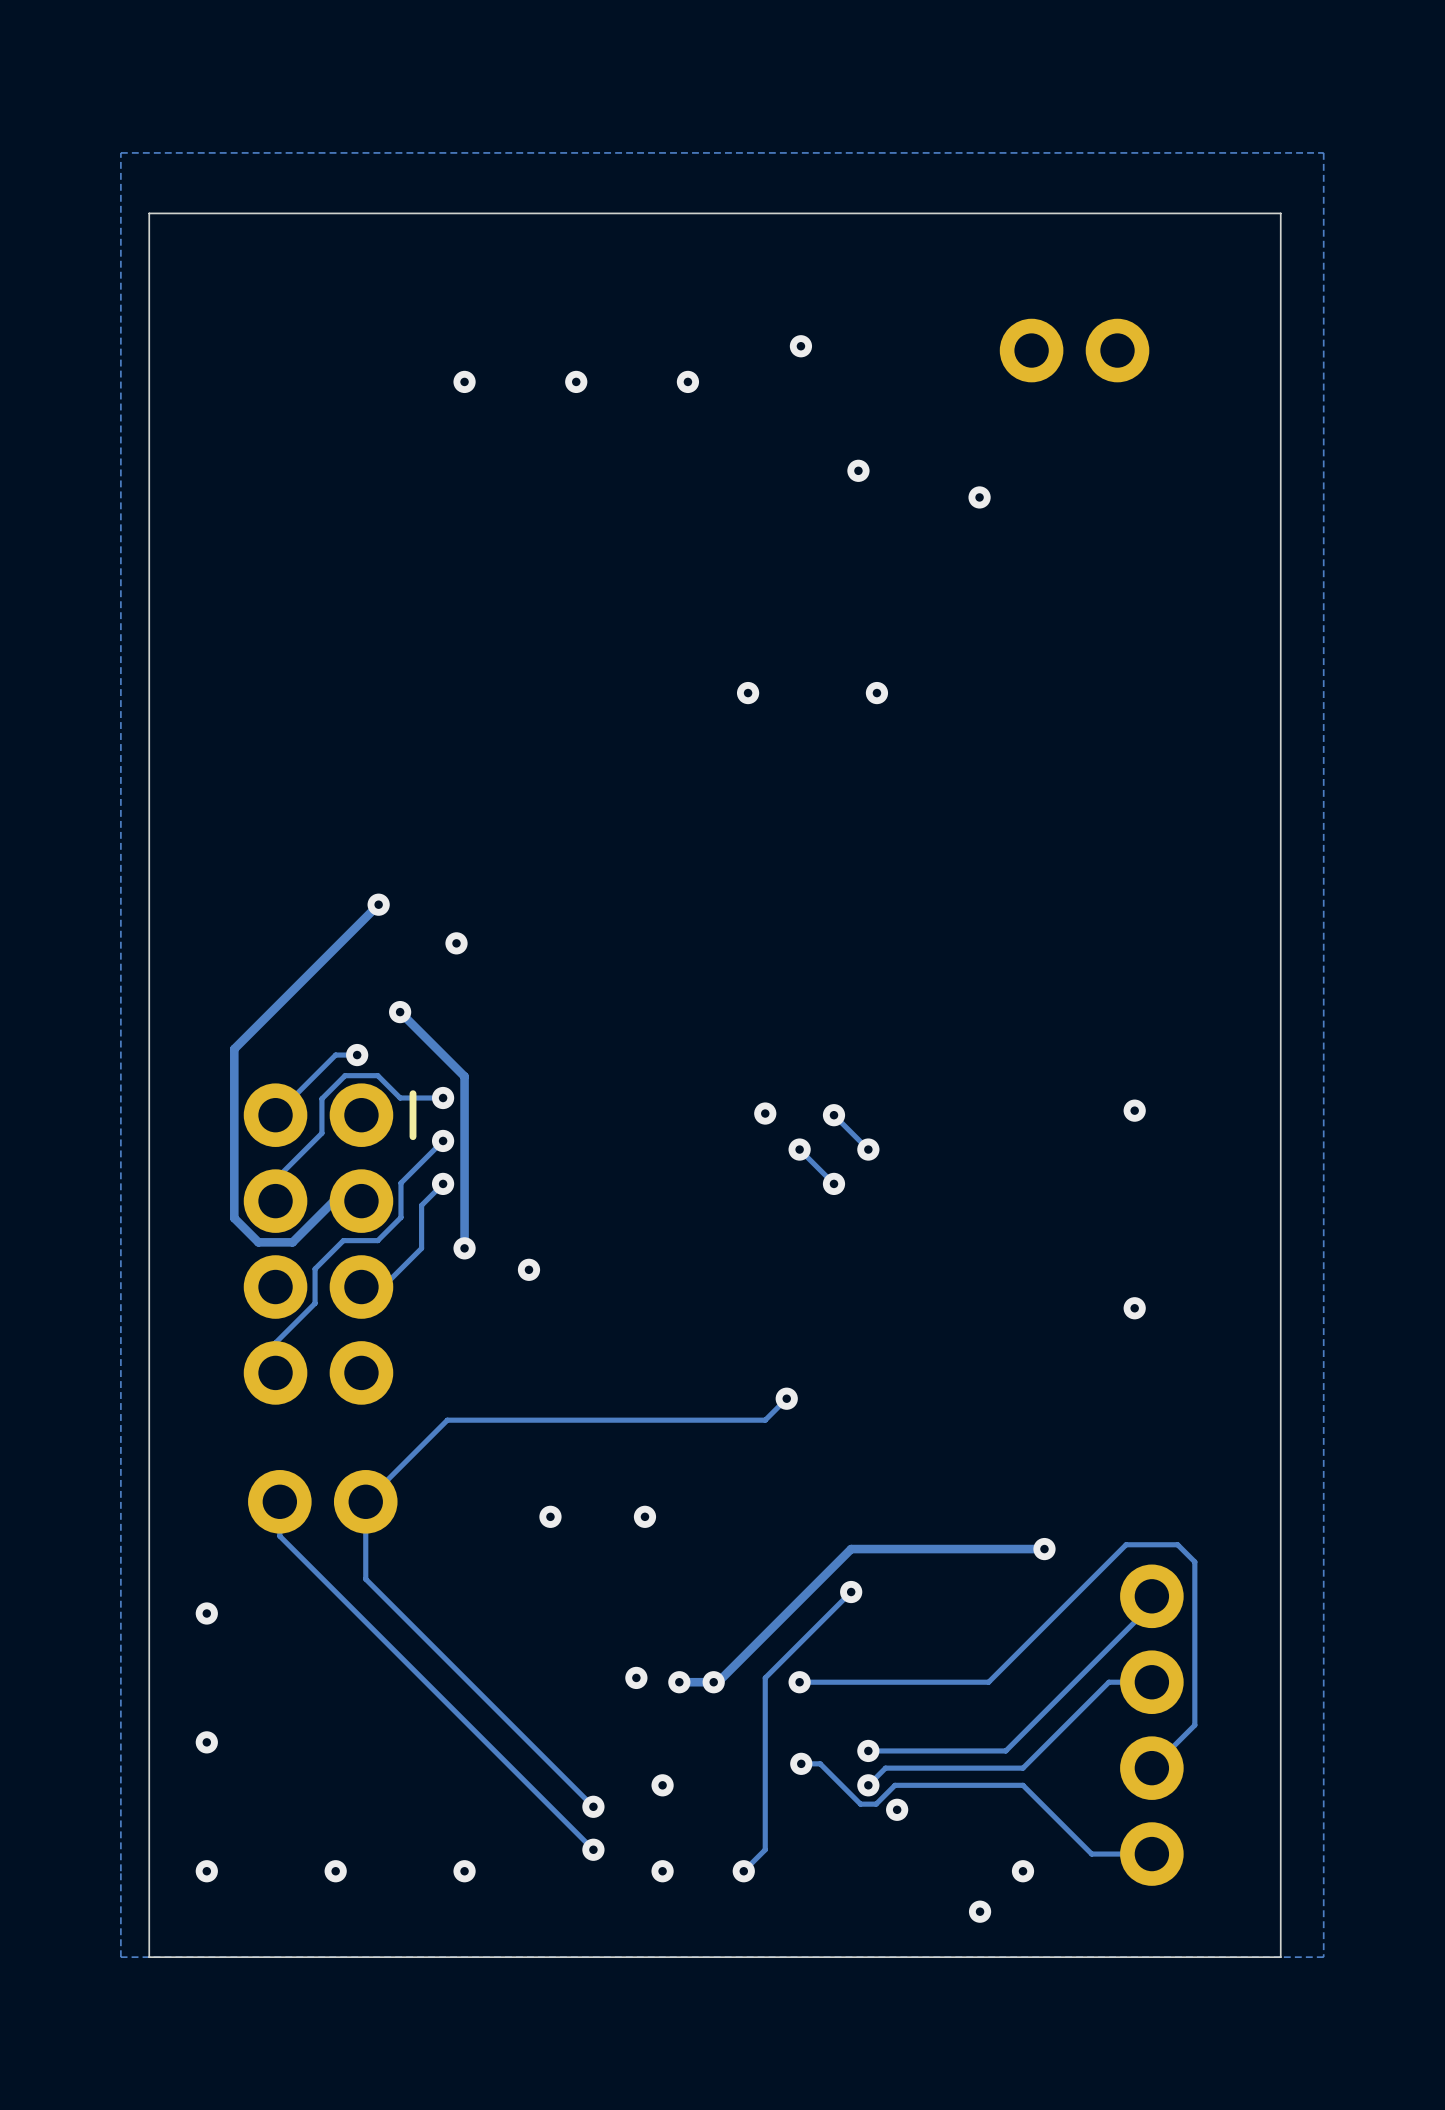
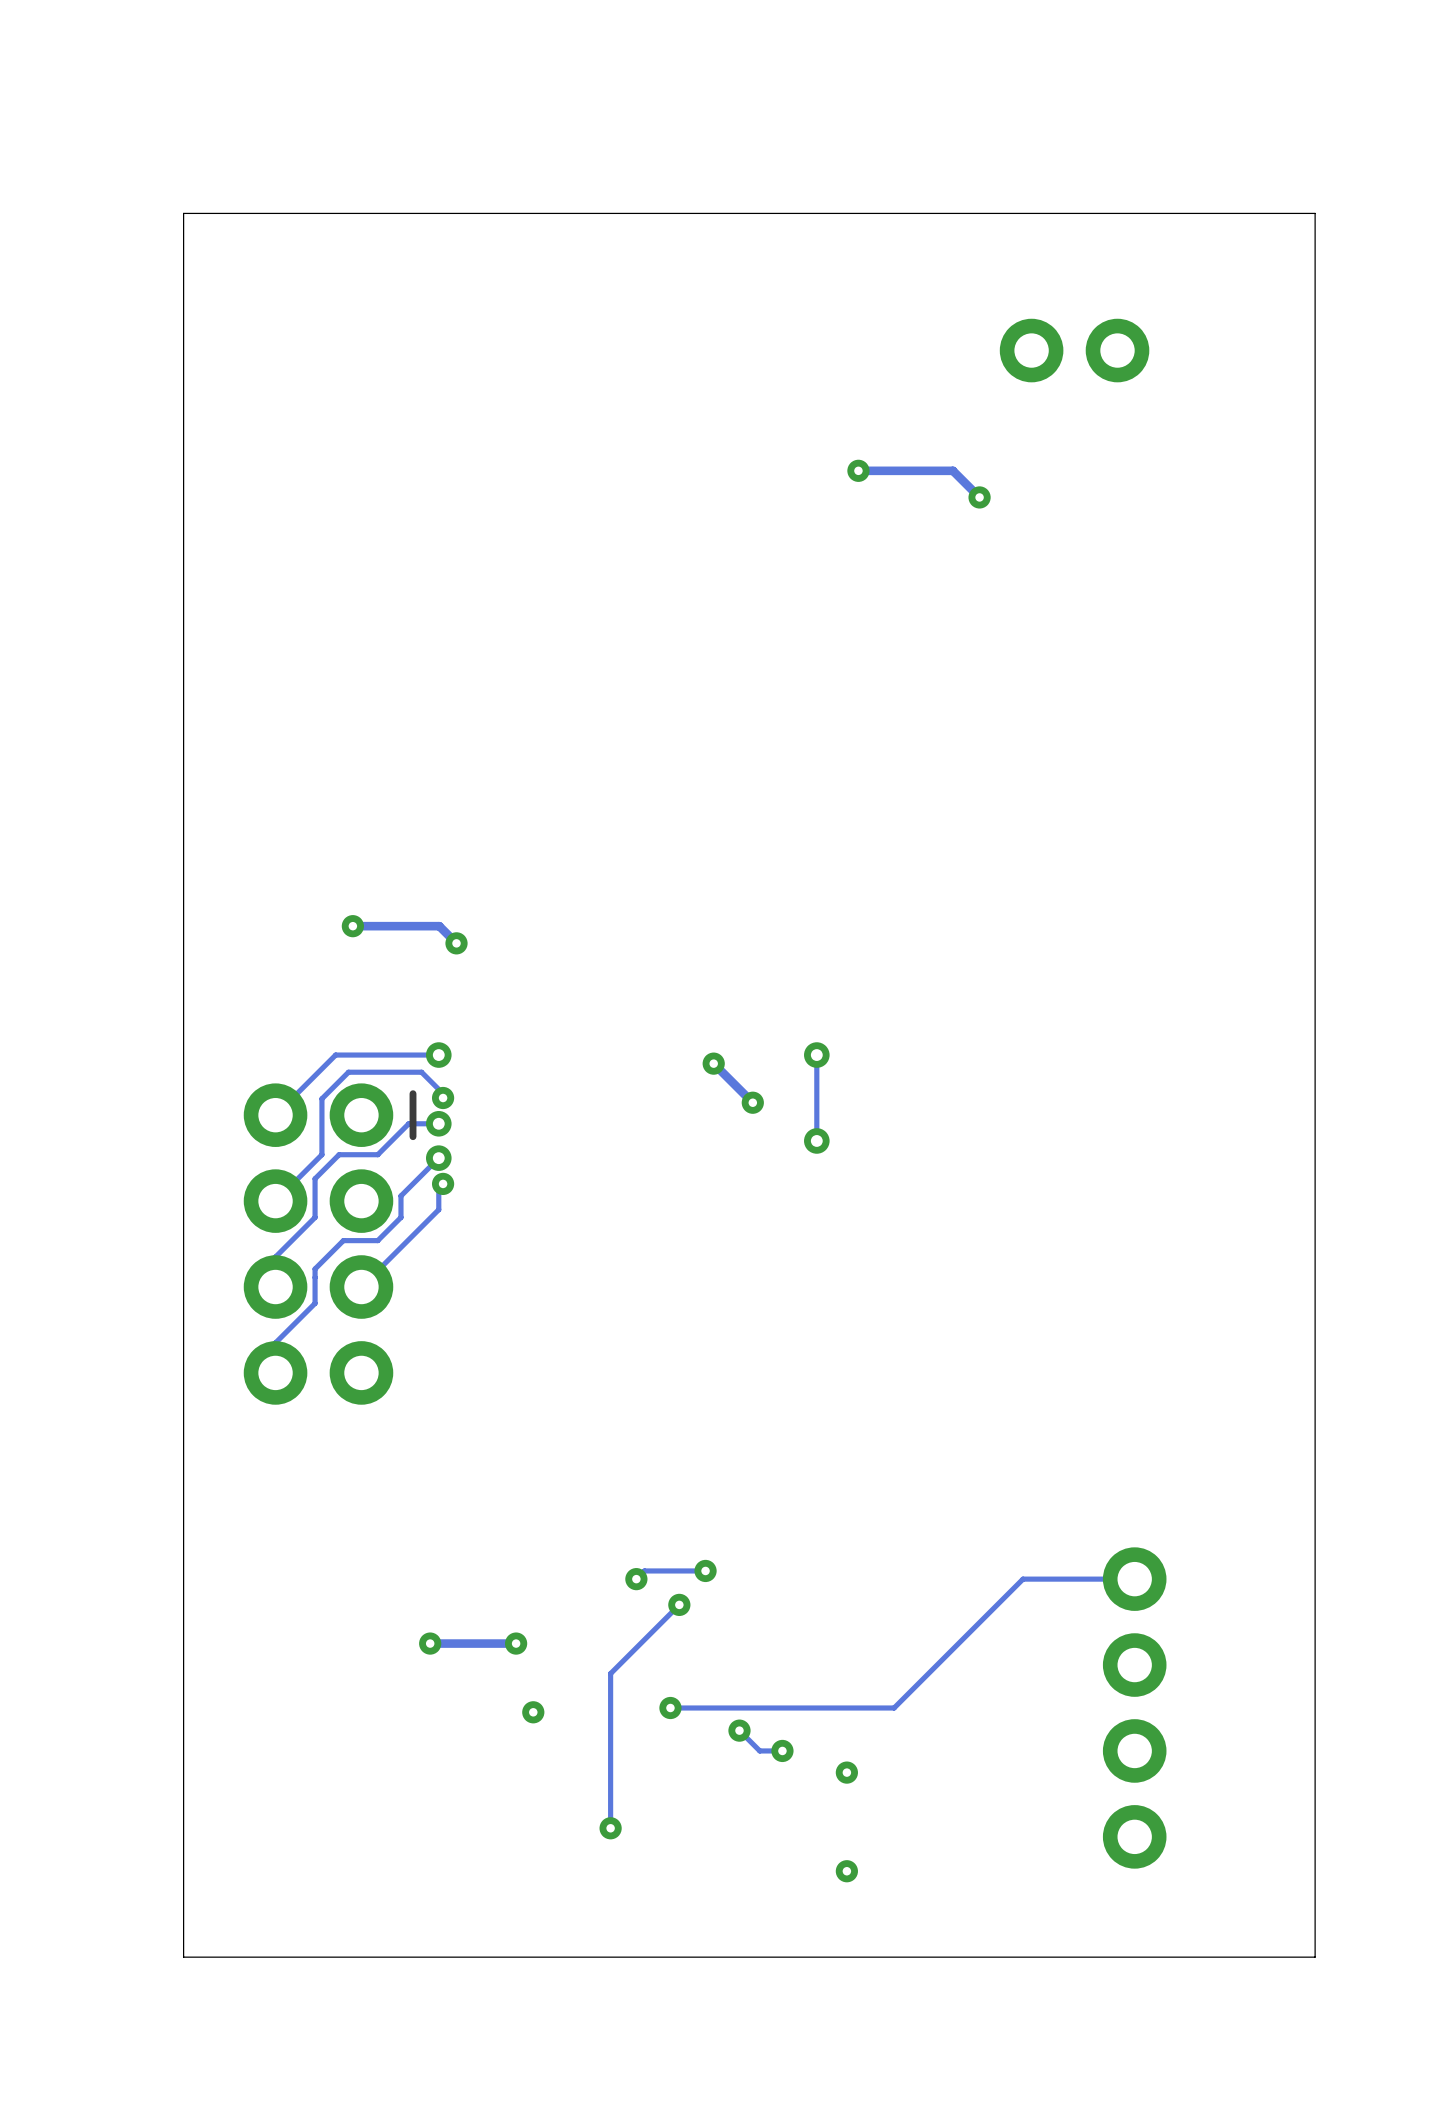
zone outline: (1323, 152) (120, 152) (120, 1957) (1323, 1957) (1323, 152) -> none
board edge: (183, 213) (149, 213) (149, 1957) (183, 1957) -> (183, 213) (183, 1957)
board edge: (1280, 213) (1280, 1957) -> (1280, 213) (1315, 213) (1315, 1957) (1280, 1957)
via: (800, 346) -> none
via: (464, 381) -> none
via: (576, 381) -> none
via: (687, 381) -> none
track: none -> (858, 470) (952, 470) (979, 497)
via: (748, 693) -> none
via: (876, 693) -> none
track: (378, 904) (234, 1049) (234, 1218) (258, 1242) (292, 1242) (333, 1201) (361, 1201) -> none
via position: (378, 904) -> (352, 926)
track: none -> (352, 926) (439, 926) (456, 943)
track: (400, 1012) (464, 1076) (464, 1248) -> none
via: (400, 1012) -> none
via: (357, 1055) -> none
track: none -> (438, 1055) (357, 1055)
via: none -> (438, 1055)
track: none -> (816, 1055) (816, 1140)
via: none -> (816, 1055)
track: none -> (713, 1063) (752, 1102)
via: none -> (713, 1063)
track: (345, 1075) (377, 1075) (400, 1098) (443, 1098) -> (345, 1075) (348, 1072) (421, 1072) (438, 1089)
via: (1134, 1110) -> none
via position: (765, 1113) -> (752, 1102)
track: (833, 1115) (868, 1149) -> none
via: (833, 1115) -> none
track: none -> (438, 1123) (408, 1123) (377, 1154) (339, 1154) (315, 1178) (315, 1217) (275, 1256) (275, 1287)
via: none -> (438, 1123)
track: (321, 1133) (275, 1179) (275, 1201) -> (321, 1133) (321, 1154) (275, 1201)
track: (443, 1140) (400, 1183) (400, 1195) -> (438, 1158) (400, 1195)
via: (443, 1140) -> none
track: (799, 1149) (833, 1183) -> none
via position: (799, 1149) -> (816, 1140)
via: (868, 1149) -> none
via: none -> (438, 1158)
track: (443, 1183) (421, 1205) (421, 1248) (382, 1287) (361, 1287) -> (438, 1192) (438, 1209) (361, 1287)
via: (833, 1183) -> none
via: (464, 1248) -> none
via: (528, 1269) -> none
via: (1134, 1308) -> none
track: (786, 1398) (765, 1420) (447, 1420) (365, 1501) (365, 1579) (593, 1806) -> none
via: (786, 1398) -> none
track: (279, 1501) (279, 1536) (593, 1849) -> none
part: (322, 1501) -> none
via: (550, 1516) -> none
via: (644, 1516) -> none
track: (1044, 1549) (851, 1549) (718, 1682) (679, 1682) -> none
via: (1044, 1549) -> none
track: none -> (705, 1570) (644, 1570) (636, 1579)
via: none -> (705, 1570)
via: none -> (636, 1579)
track: none -> (1134, 1579) (1023, 1579) (894, 1708) (670, 1708)
track: (851, 1592) (765, 1677) (765, 1849) (743, 1871) -> none
via: (851, 1592) -> none
track: (1151, 1596) (1151, 1604) (1005, 1750) (868, 1750) -> none
track: none -> (679, 1604) (610, 1673) (610, 1828)
via: none -> (679, 1604)
via: (206, 1613) -> none
via: none -> (430, 1643)
track: none -> (516, 1643) (430, 1643)
via: none -> (516, 1643)
via: (636, 1677) -> none
via: (679, 1682) -> none
via: (713, 1682) -> none
track: (799, 1682) (988, 1682) (1126, 1544) (1177, 1544) (1194, 1561) (1194, 1725) (1151, 1768) -> none
via: (799, 1682) -> none
track: (1151, 1682) (1108, 1682) (1023, 1768) (885, 1768) (868, 1785) -> none
via: none -> (670, 1708)
via: none -> (533, 1712)
part position: (1151, 1725) -> (1134, 1708)
track: none -> (739, 1730) (759, 1750) (782, 1750)
via: none -> (739, 1730)
via: (206, 1742) -> none
via: (868, 1750) -> none
track: (801, 1763) (820, 1763) (860, 1804) (876, 1804) (894, 1785) (1023, 1785) (1091, 1854) (1151, 1854) -> none
via position: (801, 1763) -> (782, 1750)
via: none -> (846, 1772)
via: (662, 1785) -> none
via: (868, 1785) -> none
via: (593, 1806) -> none
via: (897, 1809) -> none
via: none -> (610, 1828)
via: (593, 1849) -> none
via: (206, 1871) -> none
via: (335, 1871) -> none
via: (464, 1871) -> none
via: (662, 1871) -> none
via: (743, 1871) -> none
via: none -> (846, 1871)
via: (1023, 1871) -> none
via: (980, 1911) -> none

